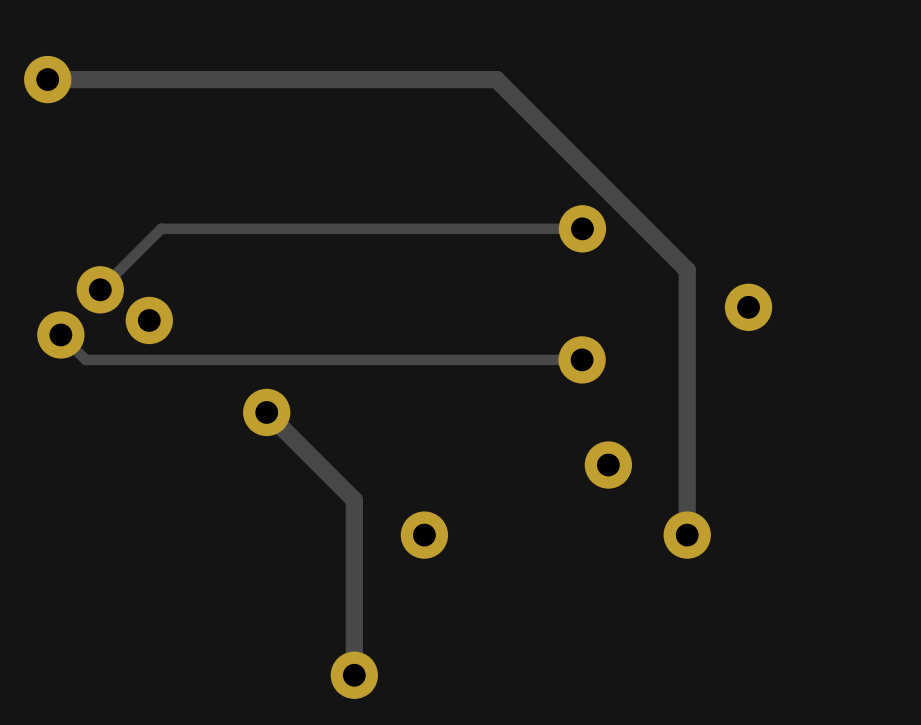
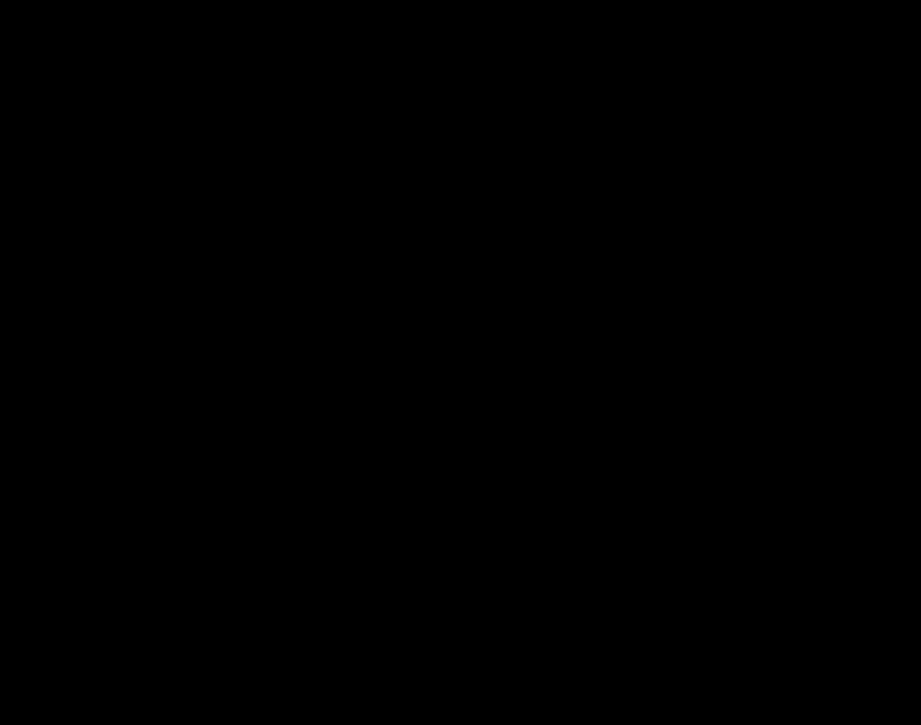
track: (47, 79) (496, 79) (687, 270) (687, 535) -> none
via: (47, 79) -> none
track: (582, 228) (161, 228) (100, 289) -> none
via: (582, 228) -> none
via: (100, 289) -> none
via: (748, 307) -> none
via: (149, 320) -> none
track: (60, 334) (85, 359) (582, 359) -> none
via: (60, 334) -> none
via: (582, 359) -> none
track: (266, 412) (354, 500) (354, 675) -> none
via: (266, 412) -> none
via: (608, 465) -> none
via: (424, 535) -> none
via: (687, 535) -> none
via: (354, 675) -> none

